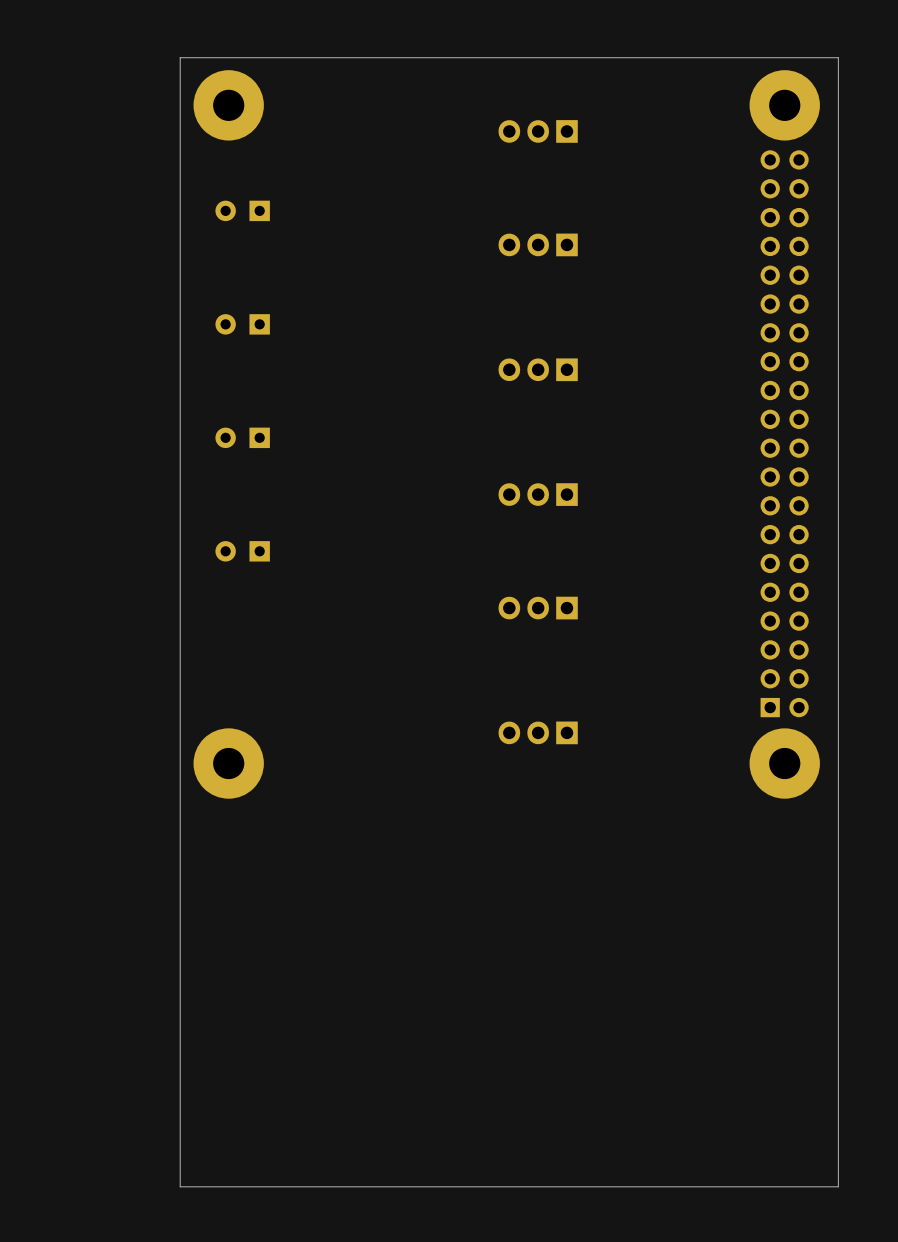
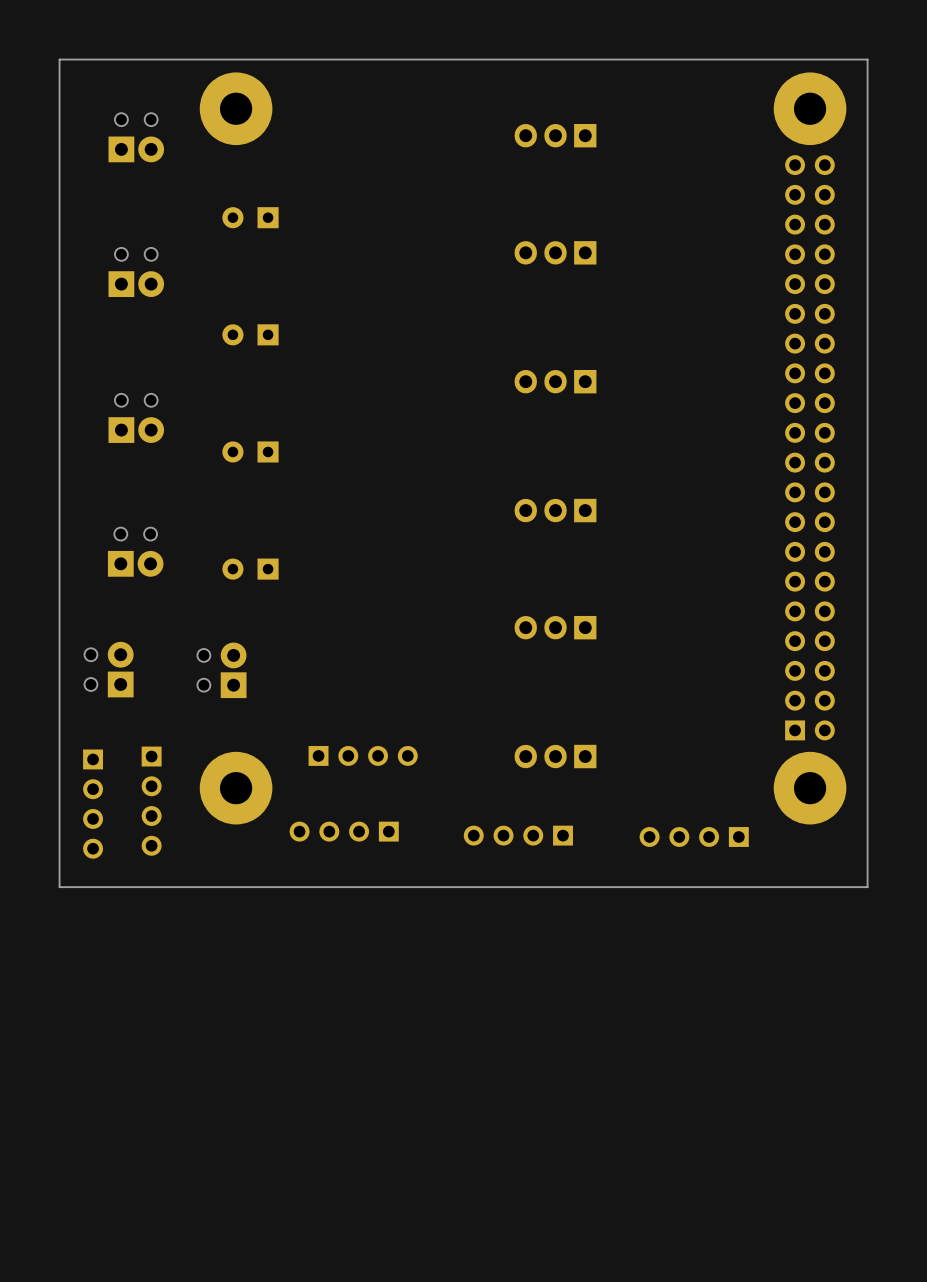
board edge: (838, 57) (838, 1186) (180, 1186) (180, 57) -> (865, 59) (867, 59) (867, 887) (59, 887) (59, 59) (186, 59)
part: none -> (136, 137)
part: none -> (136, 272)
part: none -> (136, 418)
part: none -> (135, 552)
part: none -> (109, 669)
part: none -> (221, 670)
part: none -> (363, 755)
part: none -> (151, 801)
part: none -> (93, 804)
part: none -> (344, 831)
part: none -> (518, 835)
part: none -> (694, 837)

